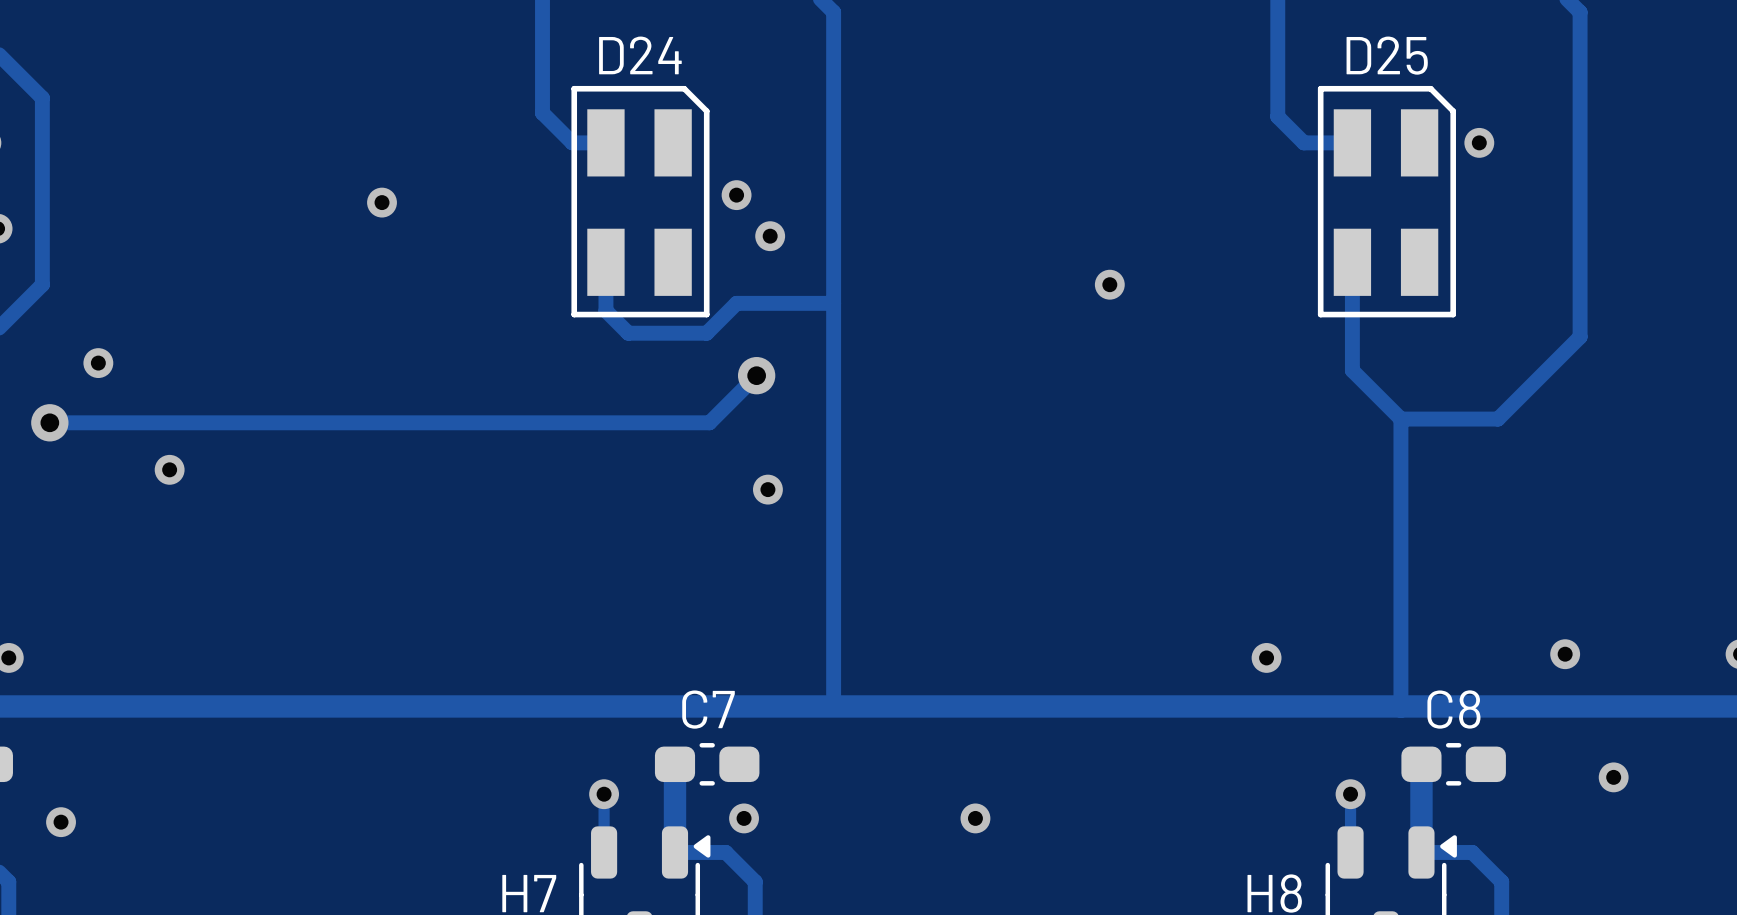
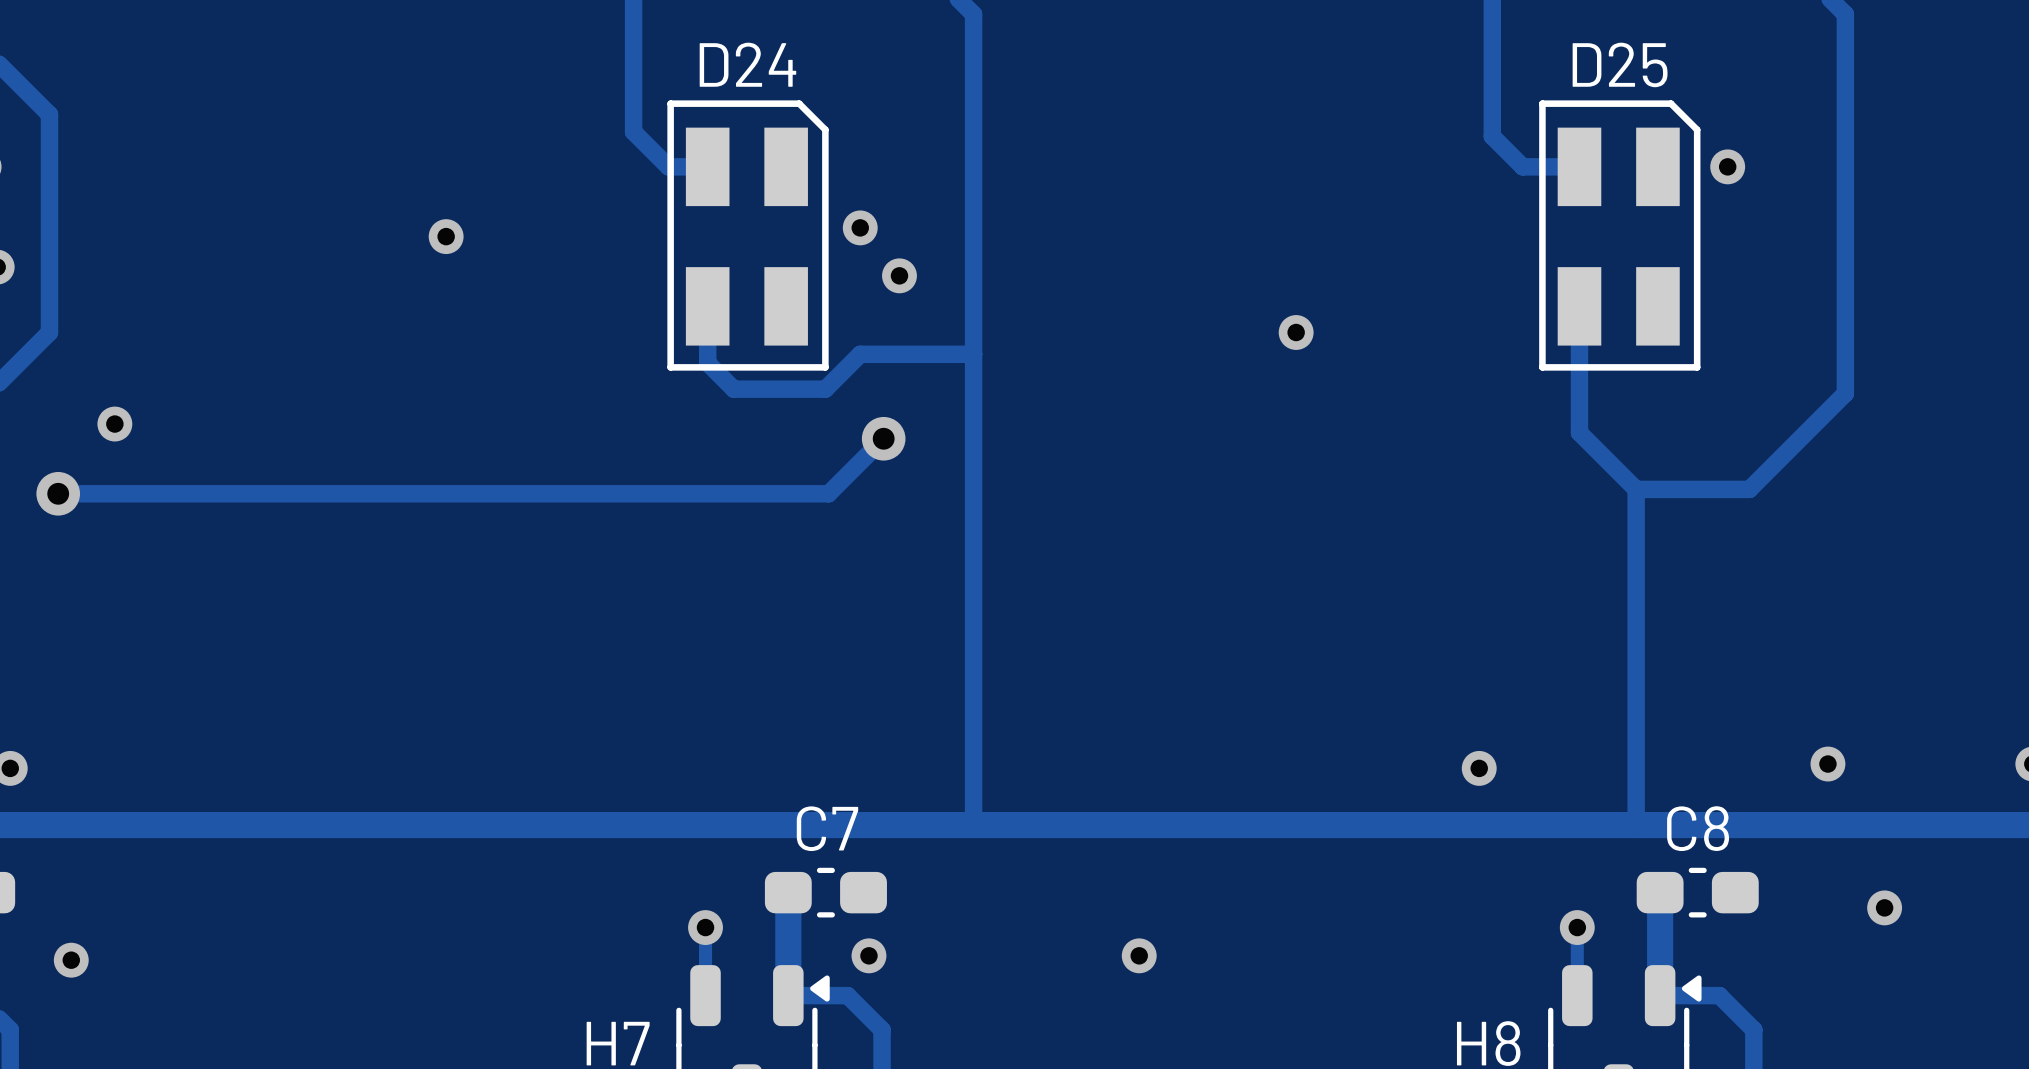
via: (169, 469) -> none
via: (767, 489) -> none

